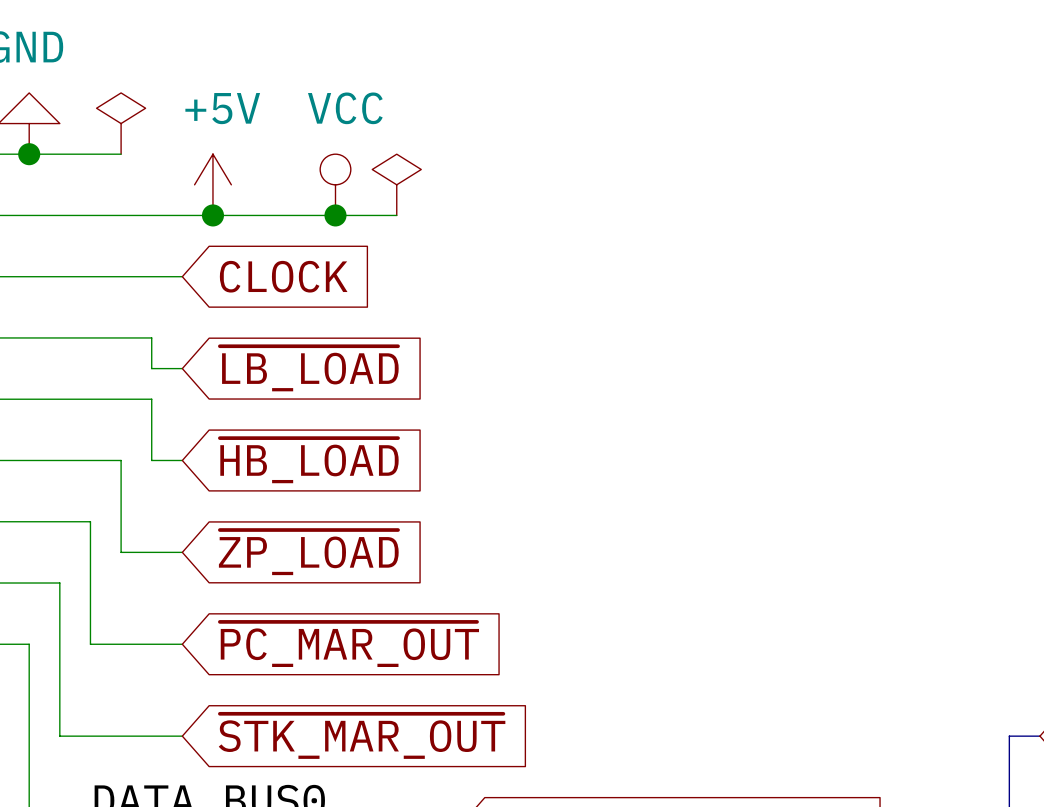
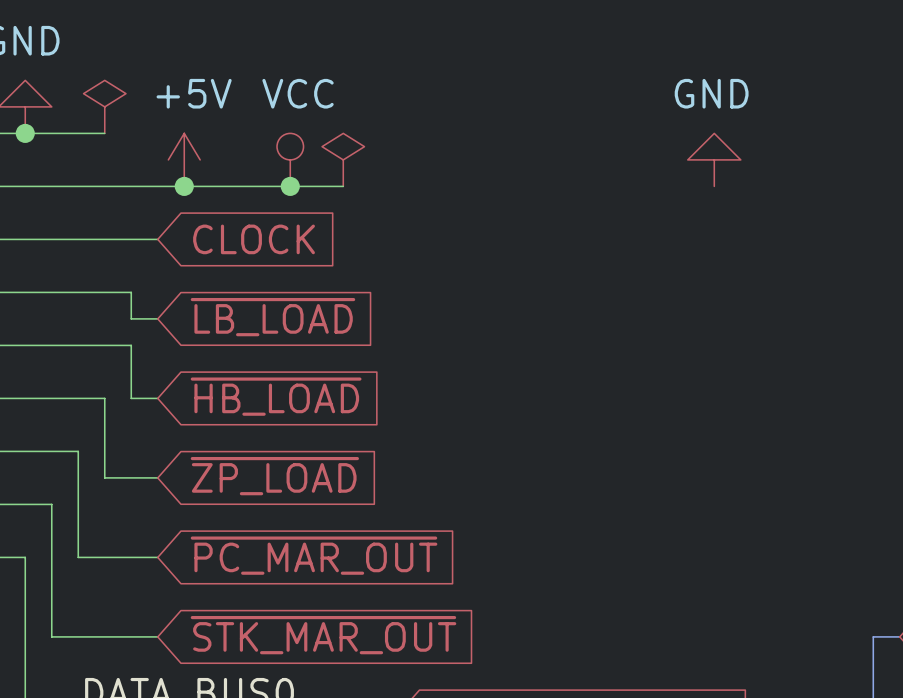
power symbol: none -> GND (714, 159)

